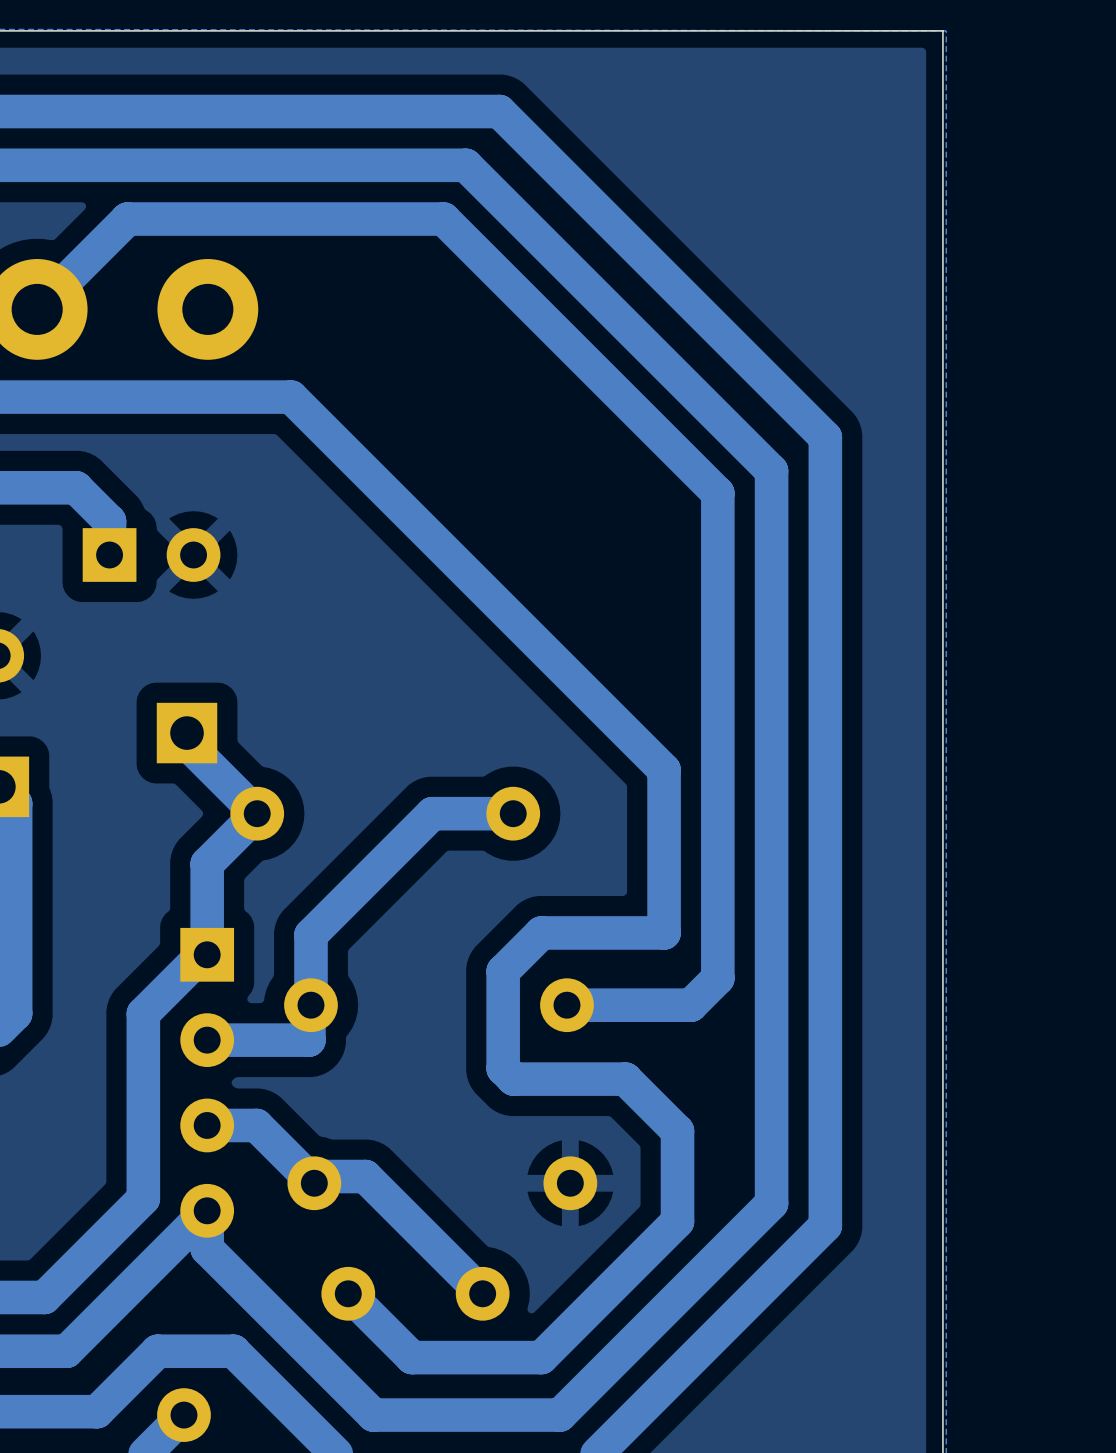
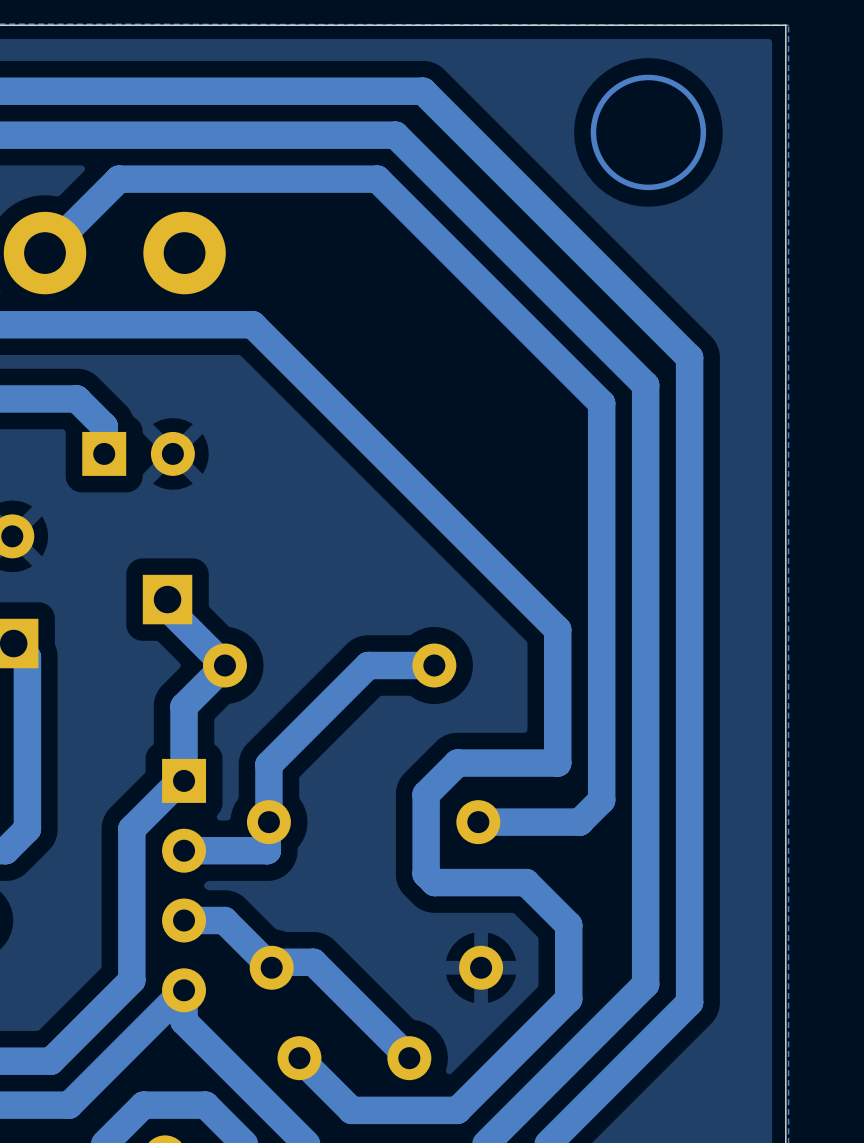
drawing: none -> [590, 74, 707, 191]

